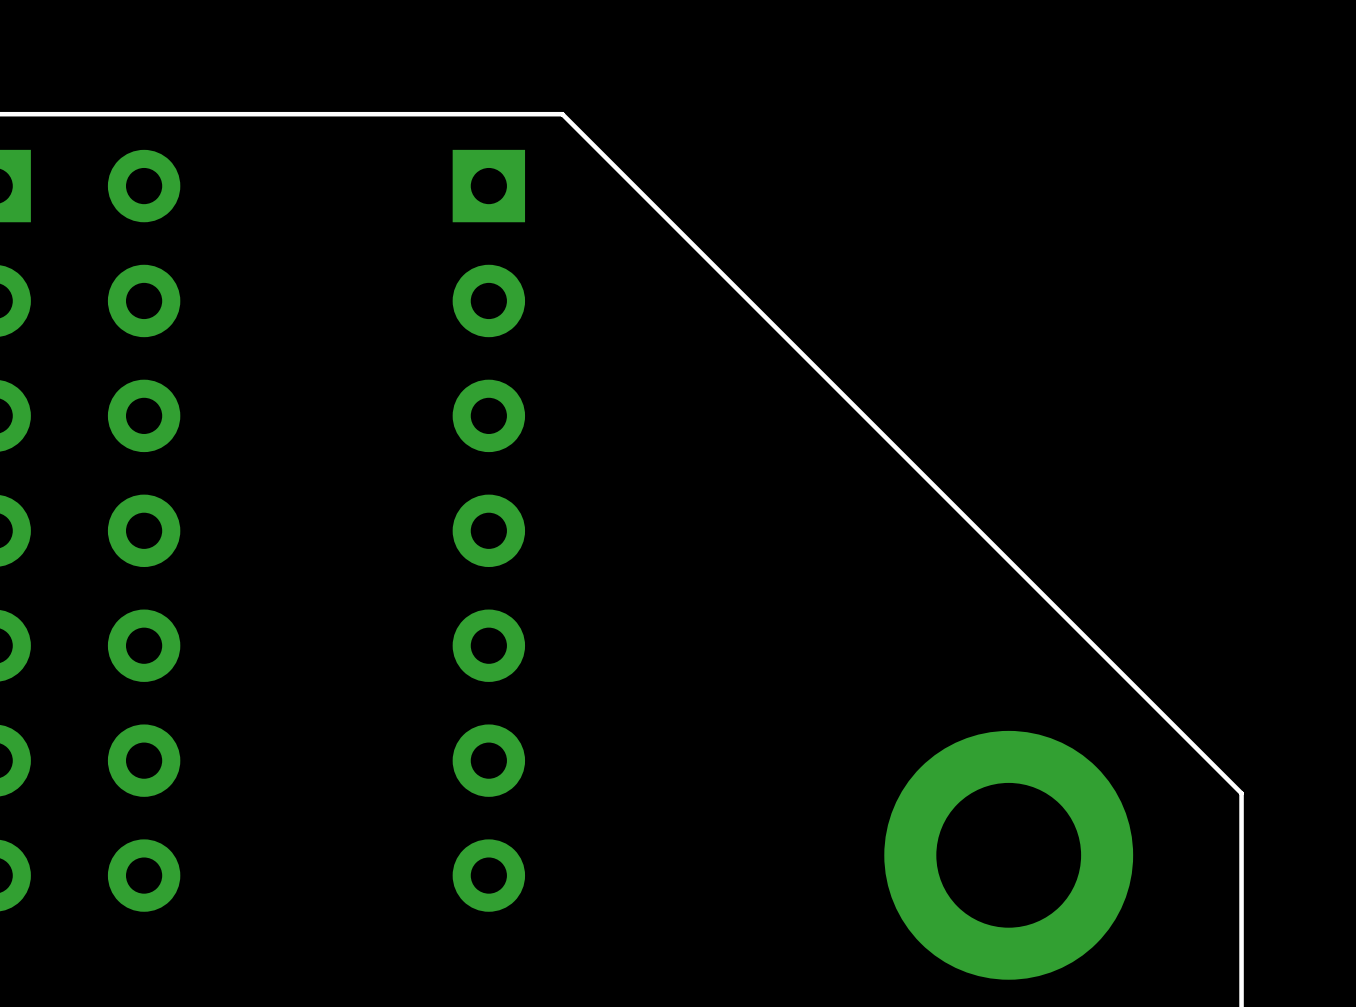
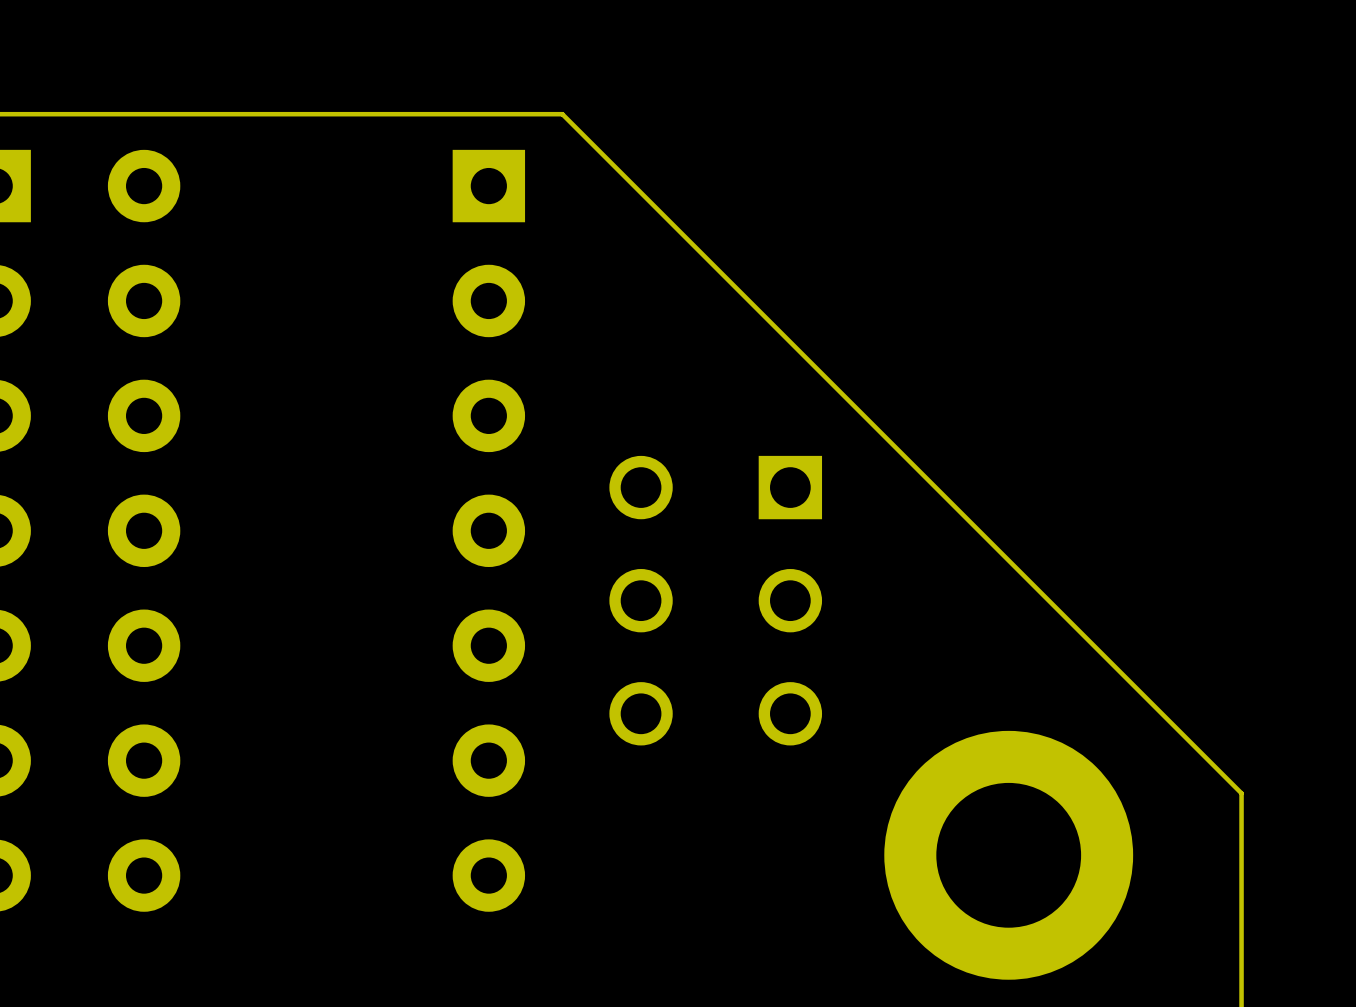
part: none -> (715, 600)

